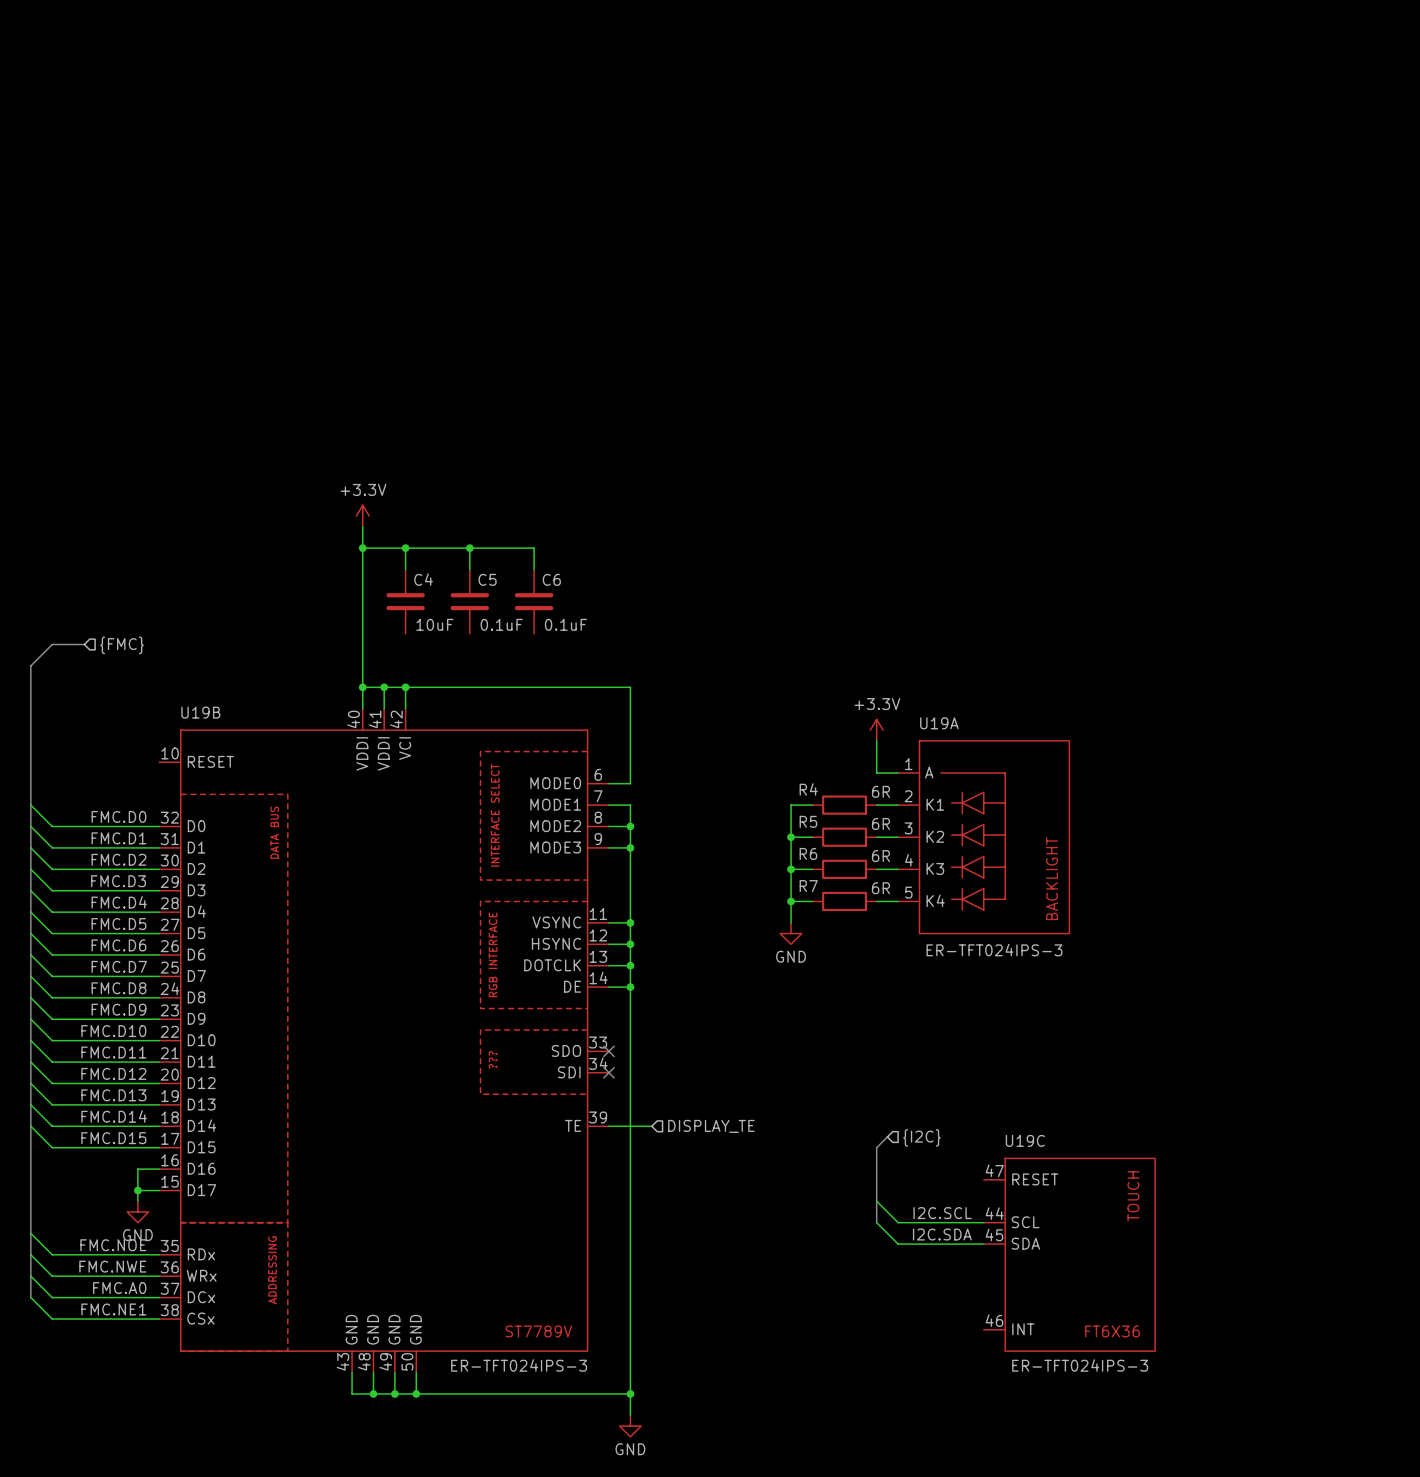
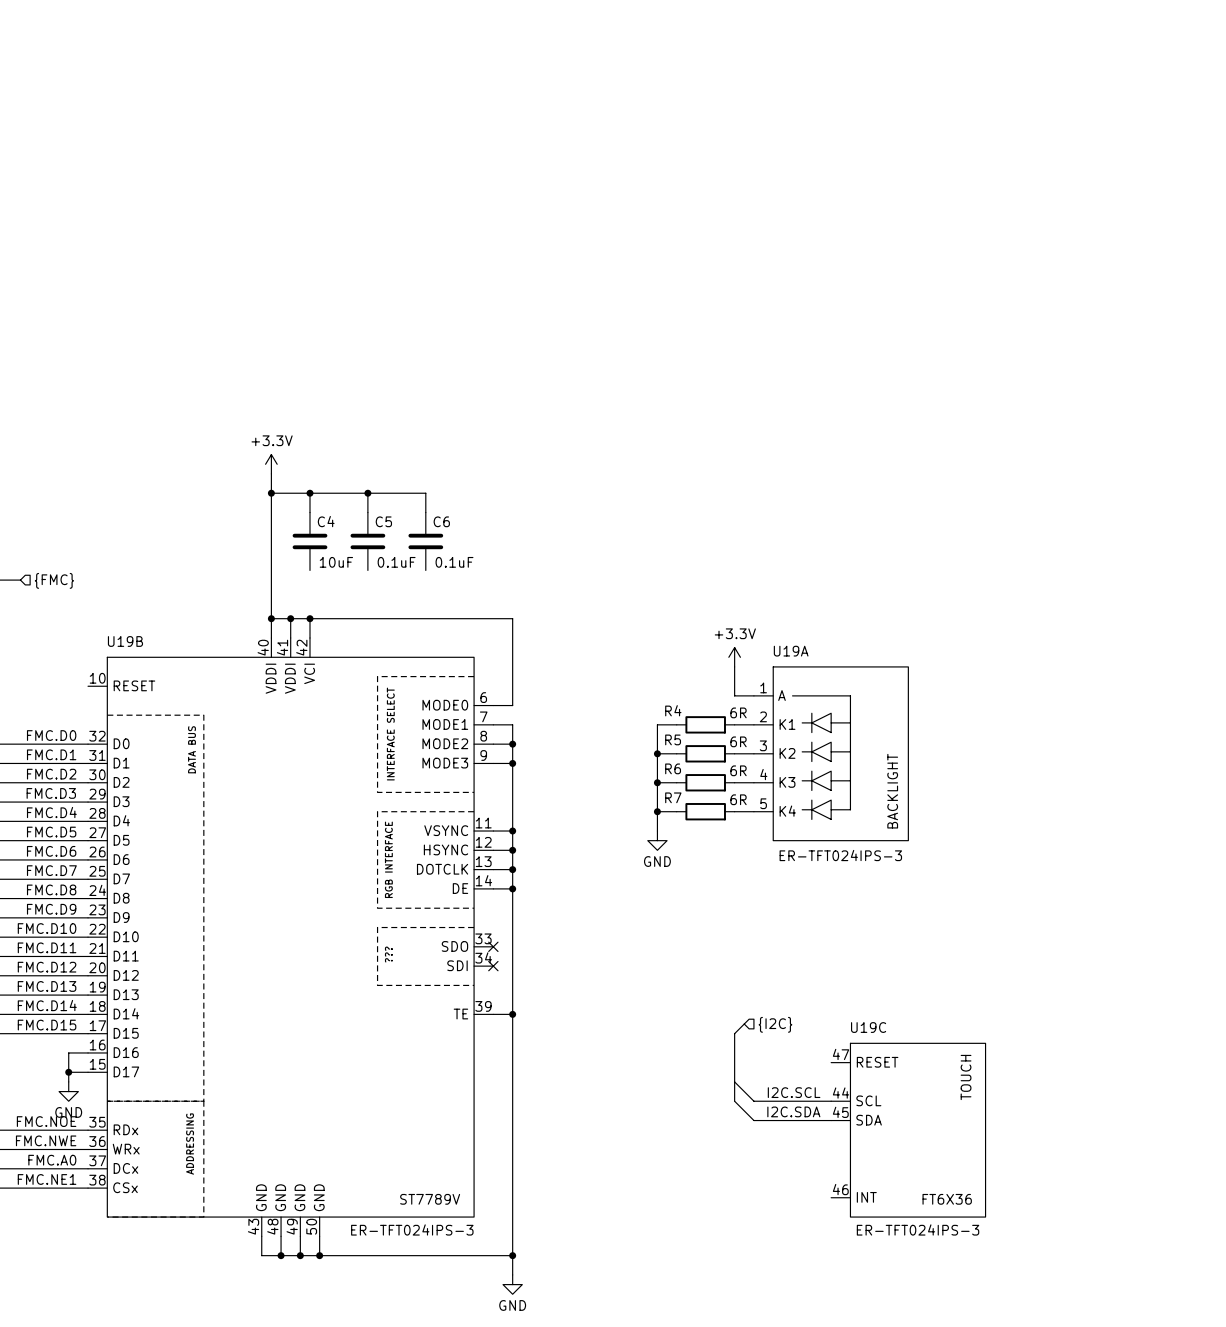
wire: (630, 1126) (651, 1126) -> none
junction: none -> (512, 1014)
hierarchical label: DISPLAY_TE (711, 1126) -> none

